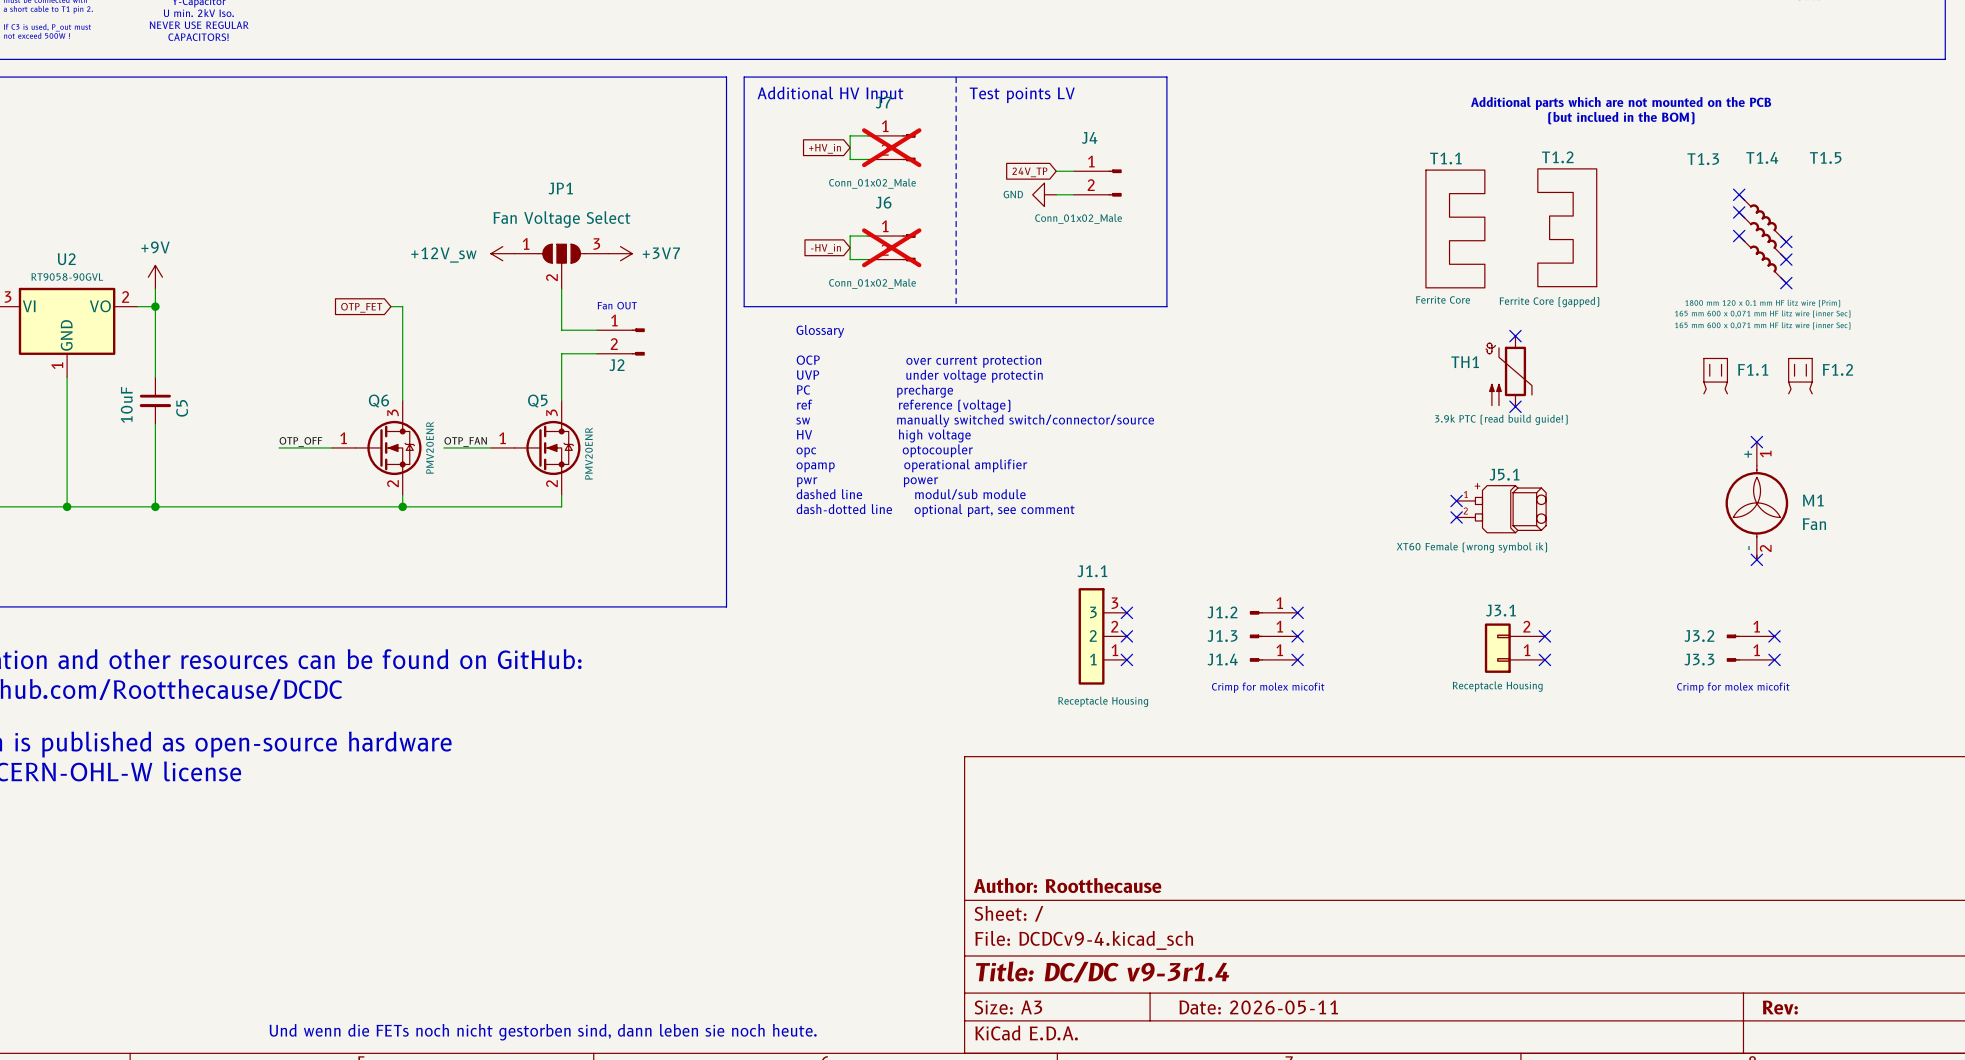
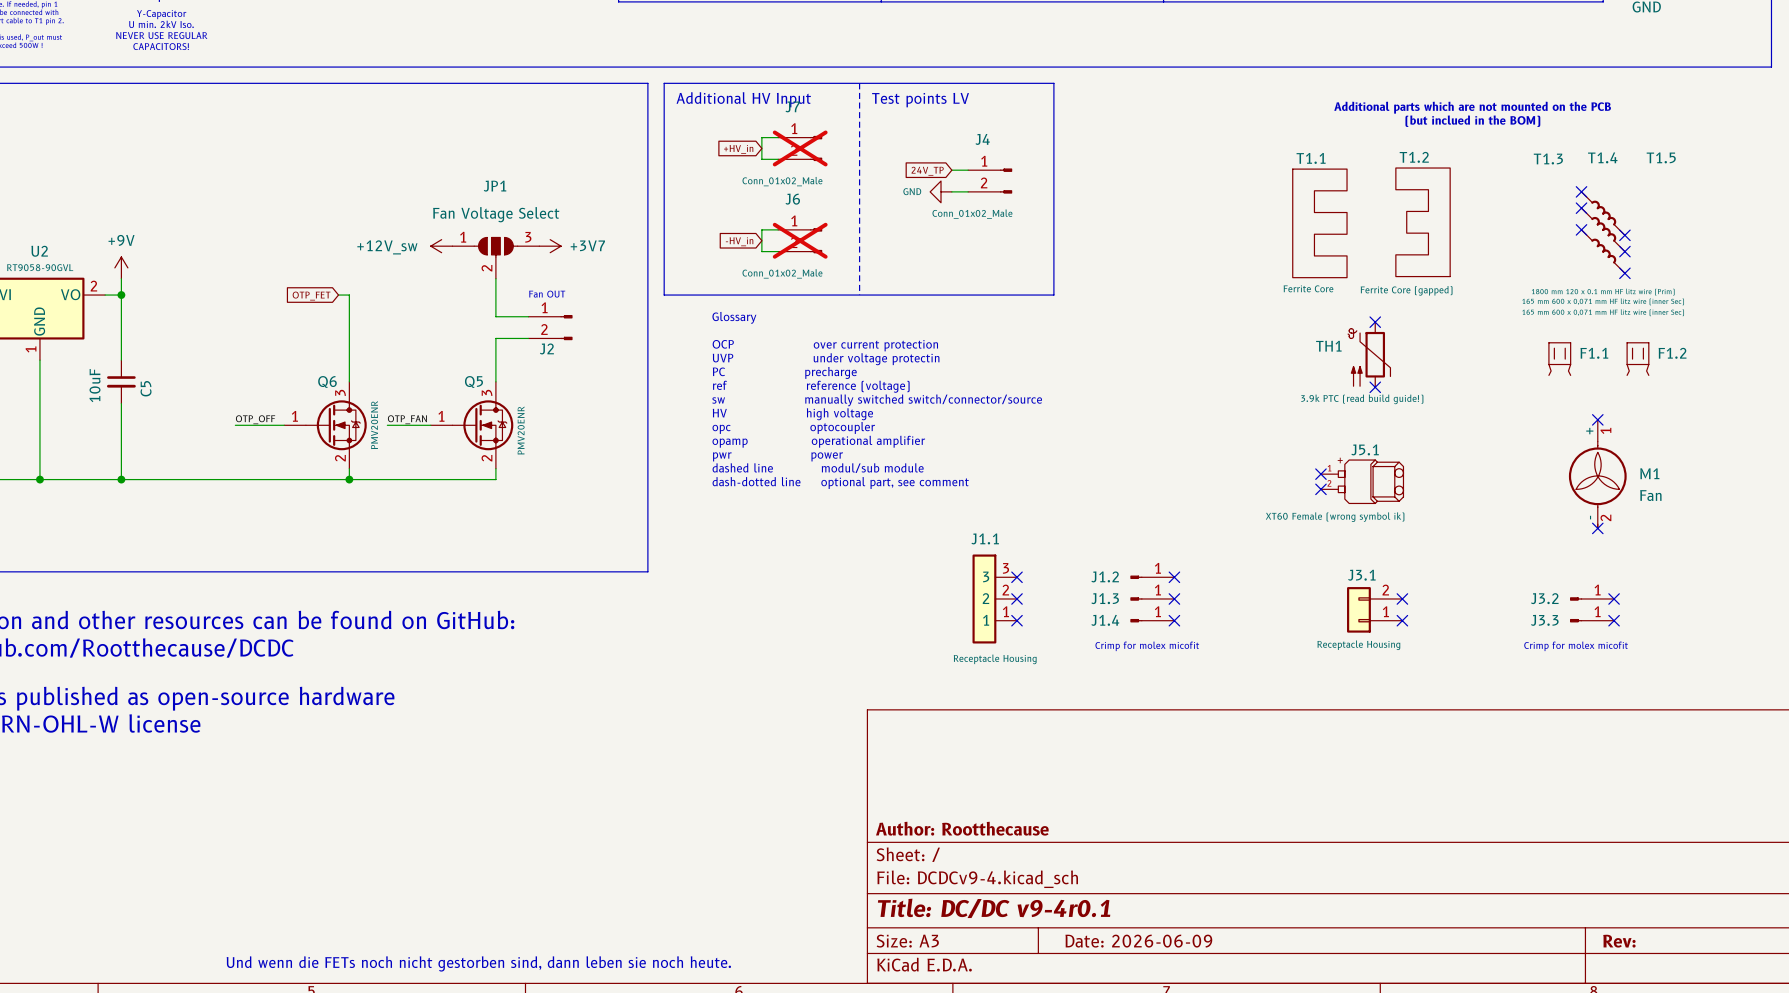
title block: Title: DC/DC v9-3r1.4 (1102, 971) -> Title: DC/DC v9-4r0.1 (994, 908)
title block: Date: 2026-05-11 (1258, 1007) -> Date: 2026-06-09 (1138, 941)

